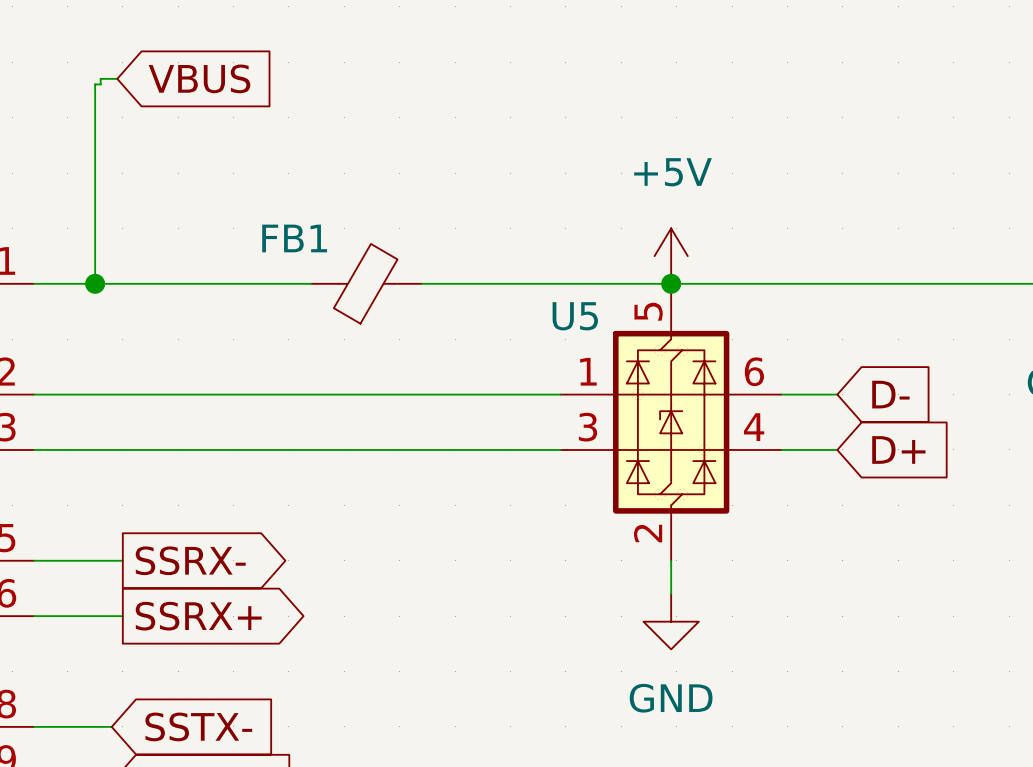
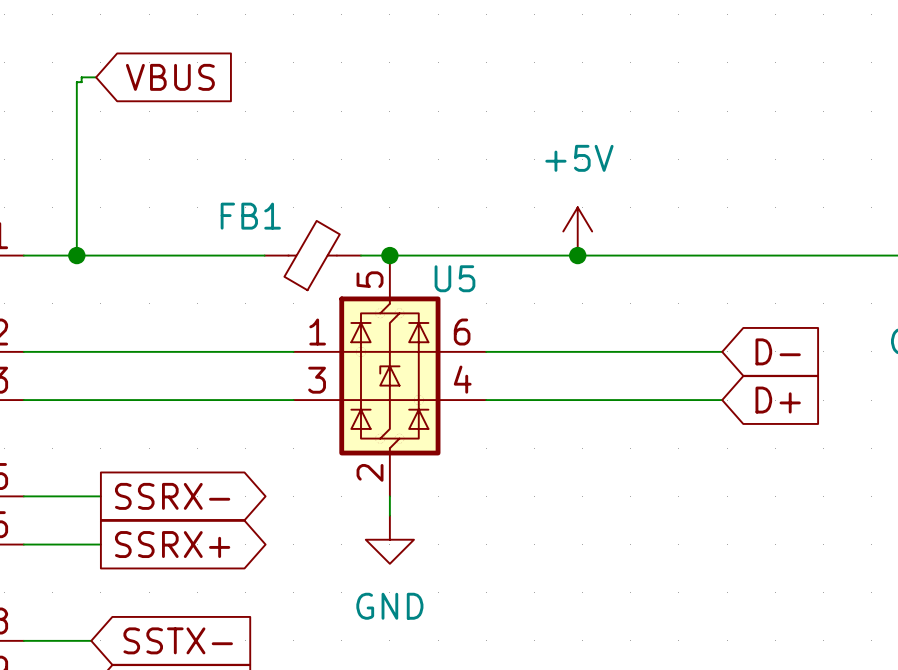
junction: none -> (389, 255)
U5 name position: U5 (575, 316) -> U5 (454, 278)
U5 position: (671, 422) -> (389, 375)
wire: none -> (389, 496) (389, 515)
wire: (671, 560) (671, 593) -> none
power symbol position: GND (671, 621) -> GND (389, 539)

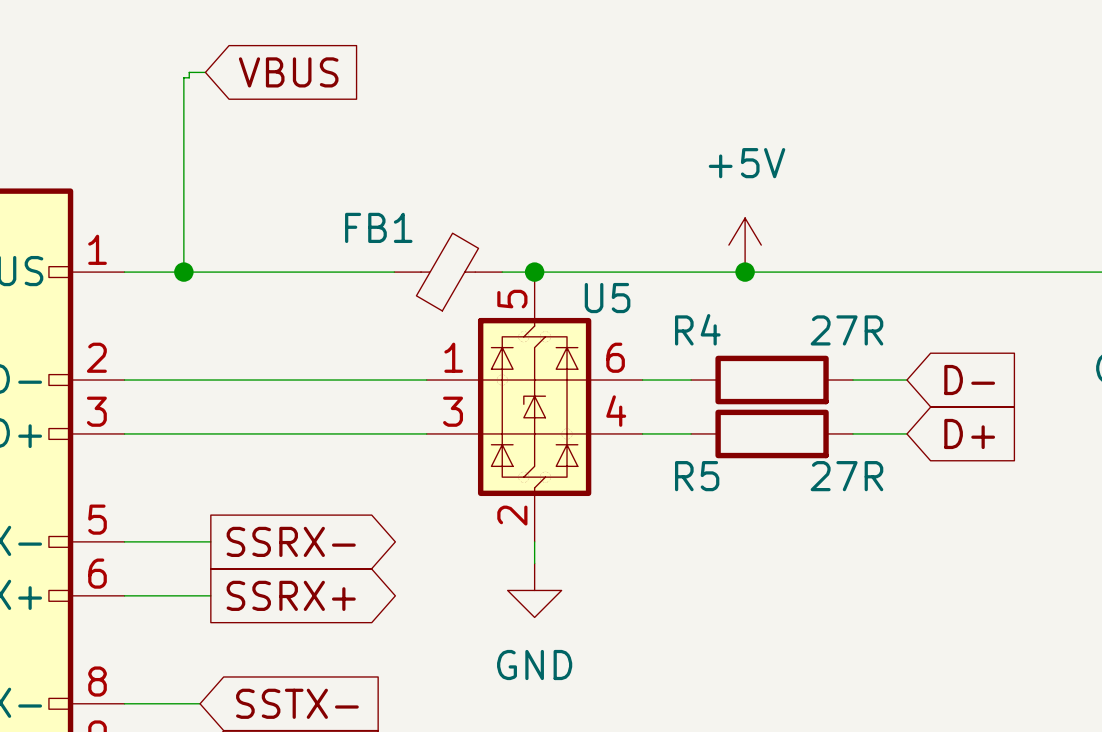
wire: (529, 351) (674, 351) -> none
R4: none -> 27R (772, 380)
wire: (529, 400) (674, 400) -> none
R5: none -> 27R (772, 433)

